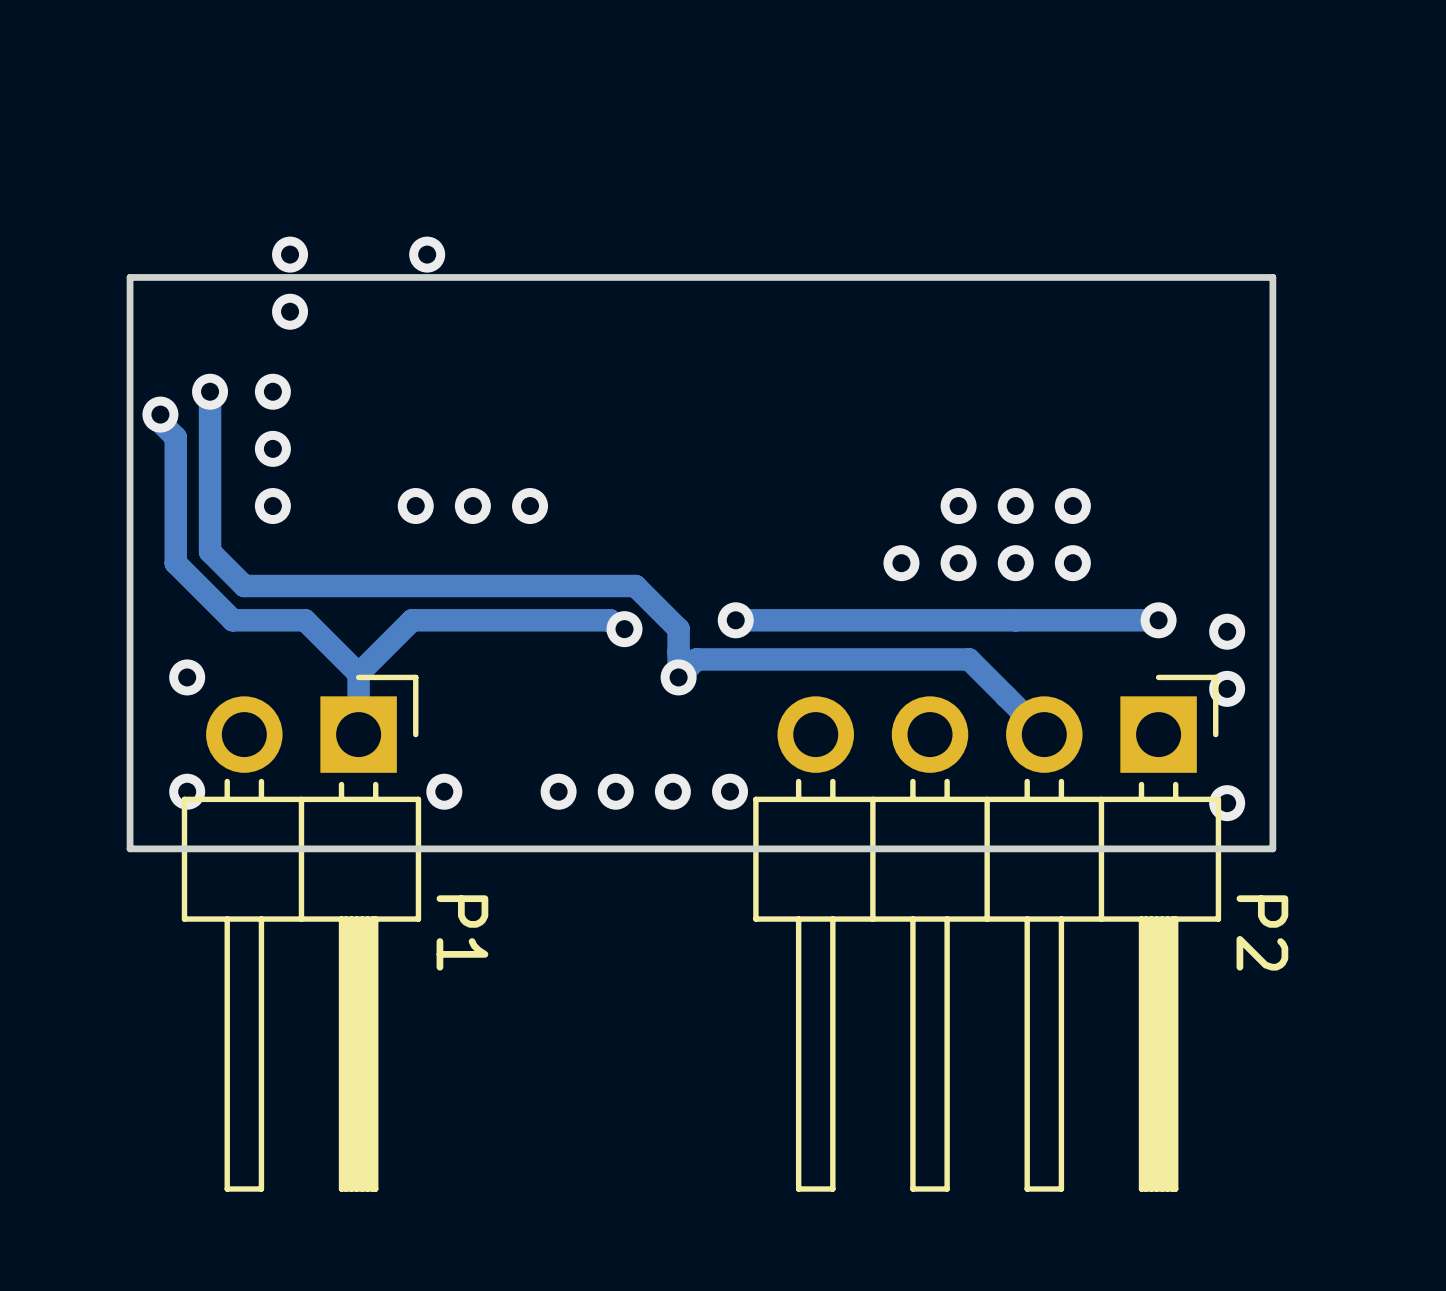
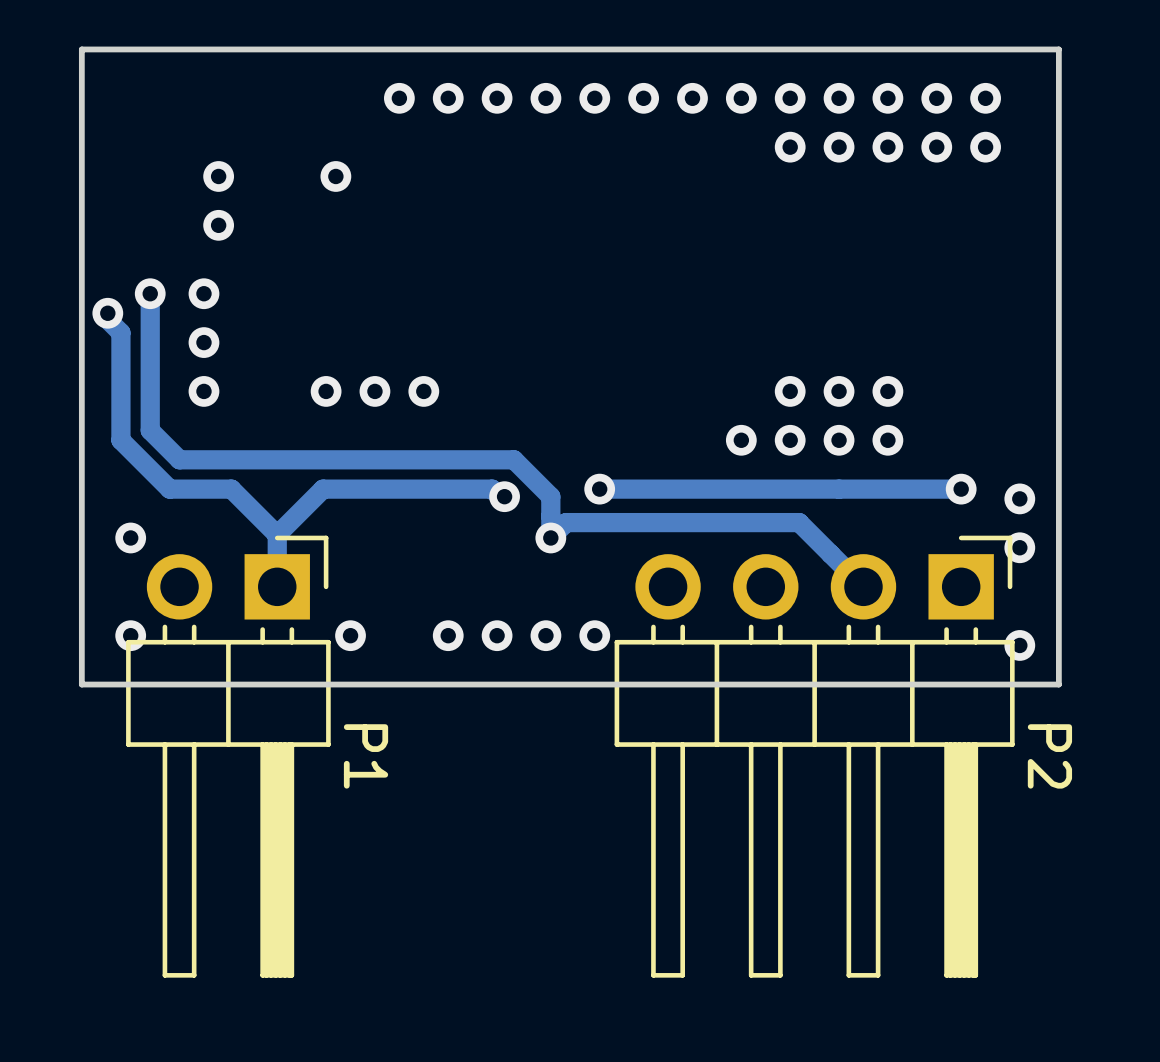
via: none -> (399, 98)
via: none -> (448, 98)
via: none -> (497, 98)
via: none -> (545, 98)
via: none -> (594, 98)
via: none -> (643, 98)
via: none -> (692, 98)
via: none -> (741, 98)
via: none -> (790, 98)
via: none -> (839, 98)
via: none -> (887, 98)
via: none -> (936, 98)
via: none -> (985, 98)
via: none -> (790, 147)
via: none -> (839, 147)
via: none -> (887, 147)
via: none -> (936, 147)
via: none -> (985, 147)
board edge: (1272, 277) (130, 277) -> (1058, 196) (1058, 49) (81, 49) (81, 196)

